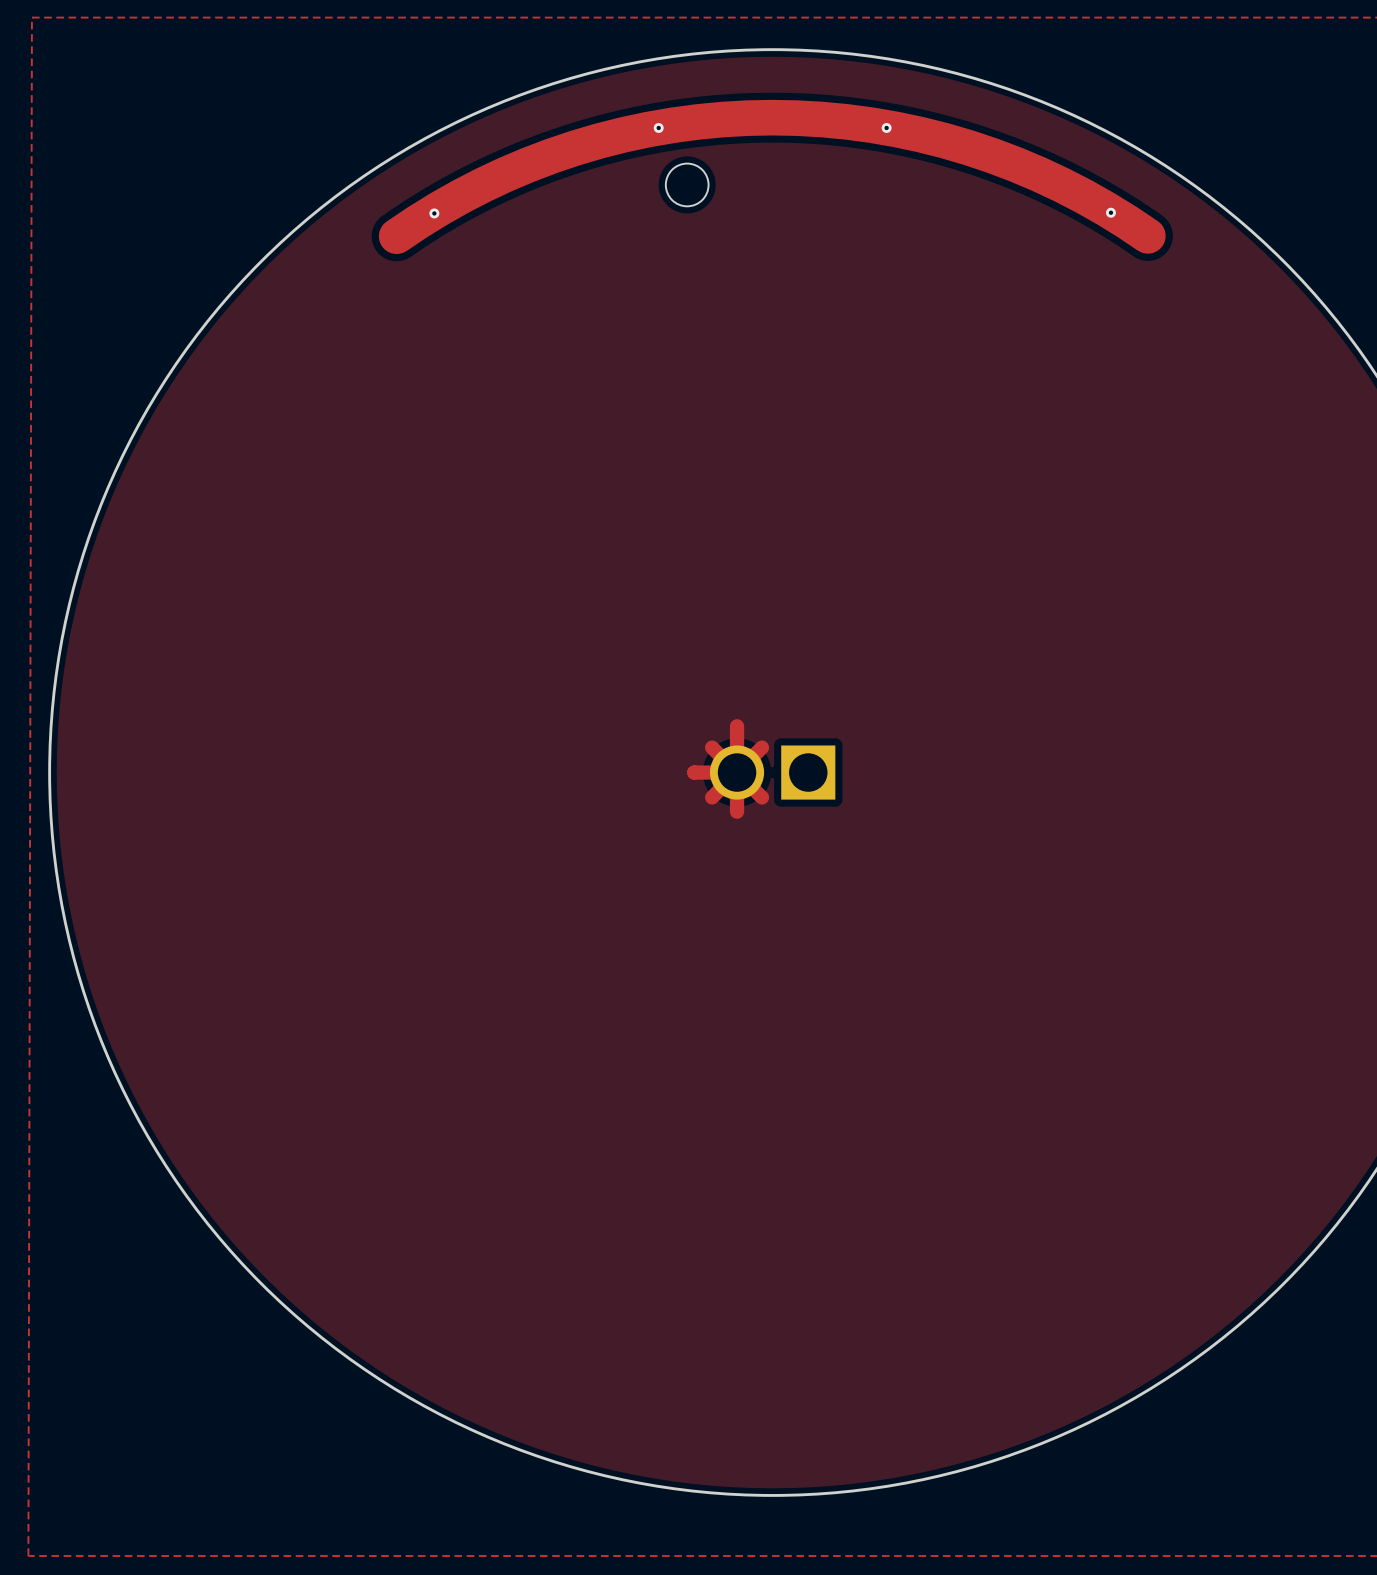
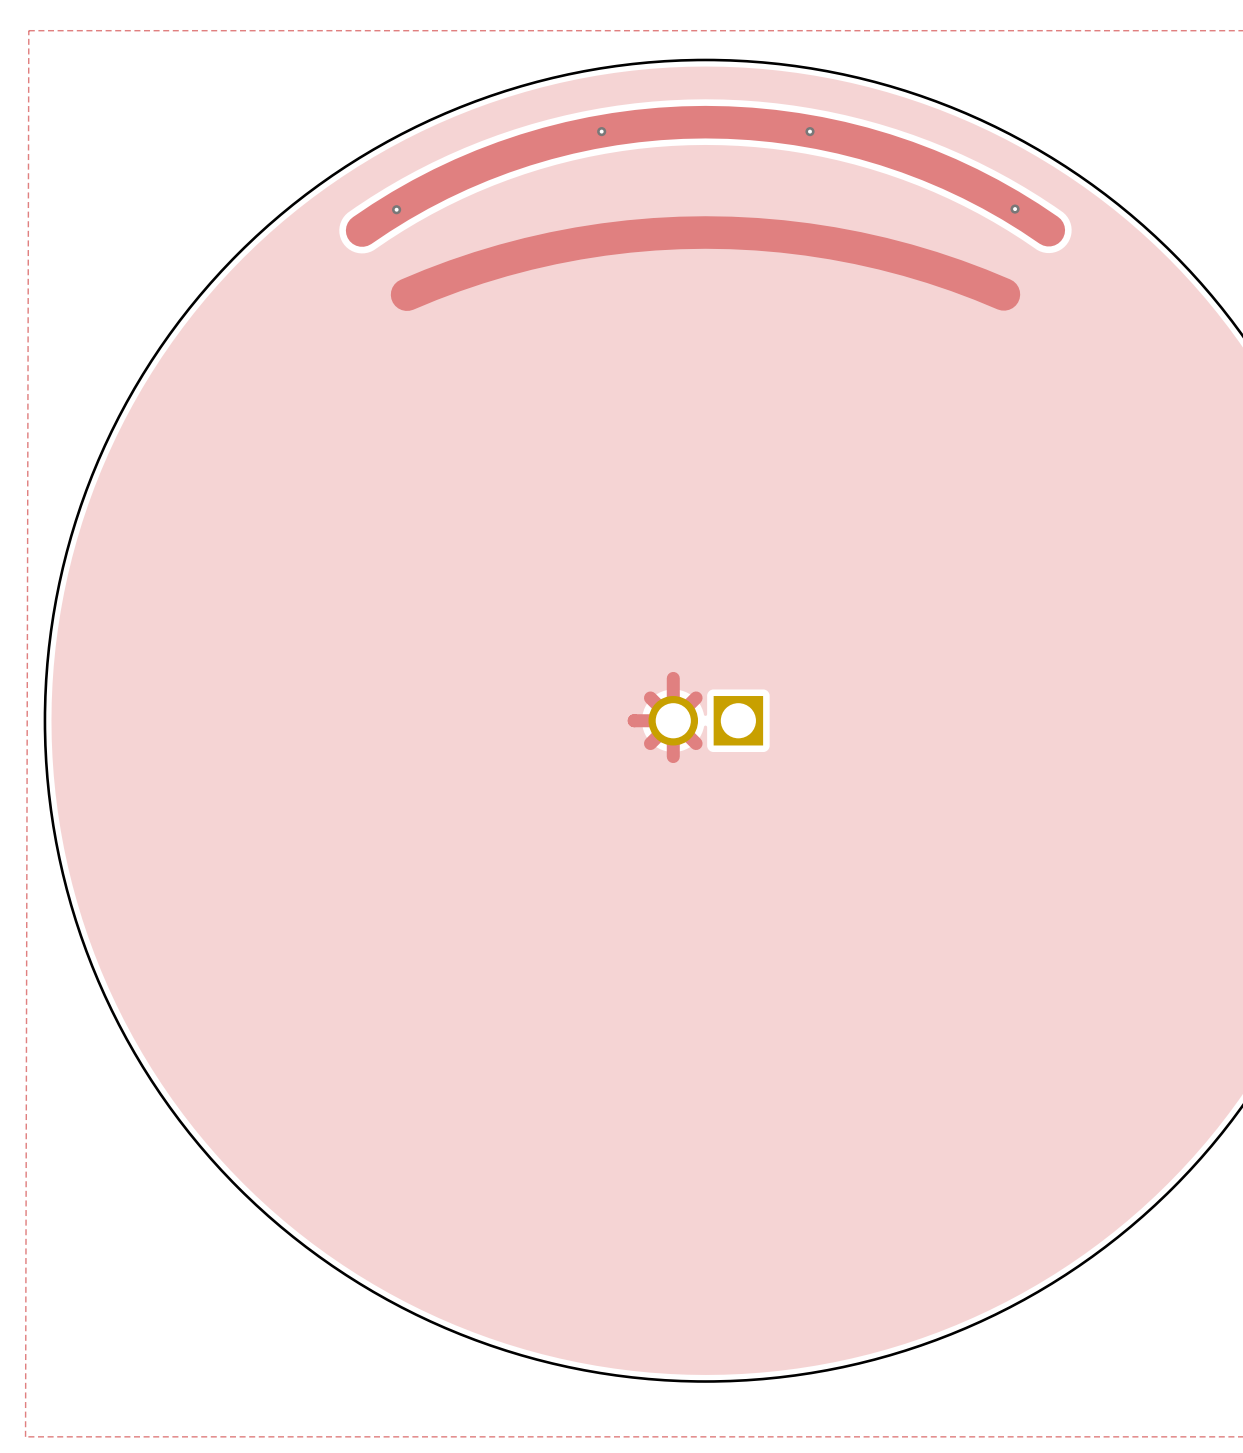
round board edge: [665, 162, 710, 208] -> none
track: none -> (1003, 294) (932, 267) (857, 248) (782, 236) (705, 232) (628, 236) (553, 248) (478, 267) (407, 294)

